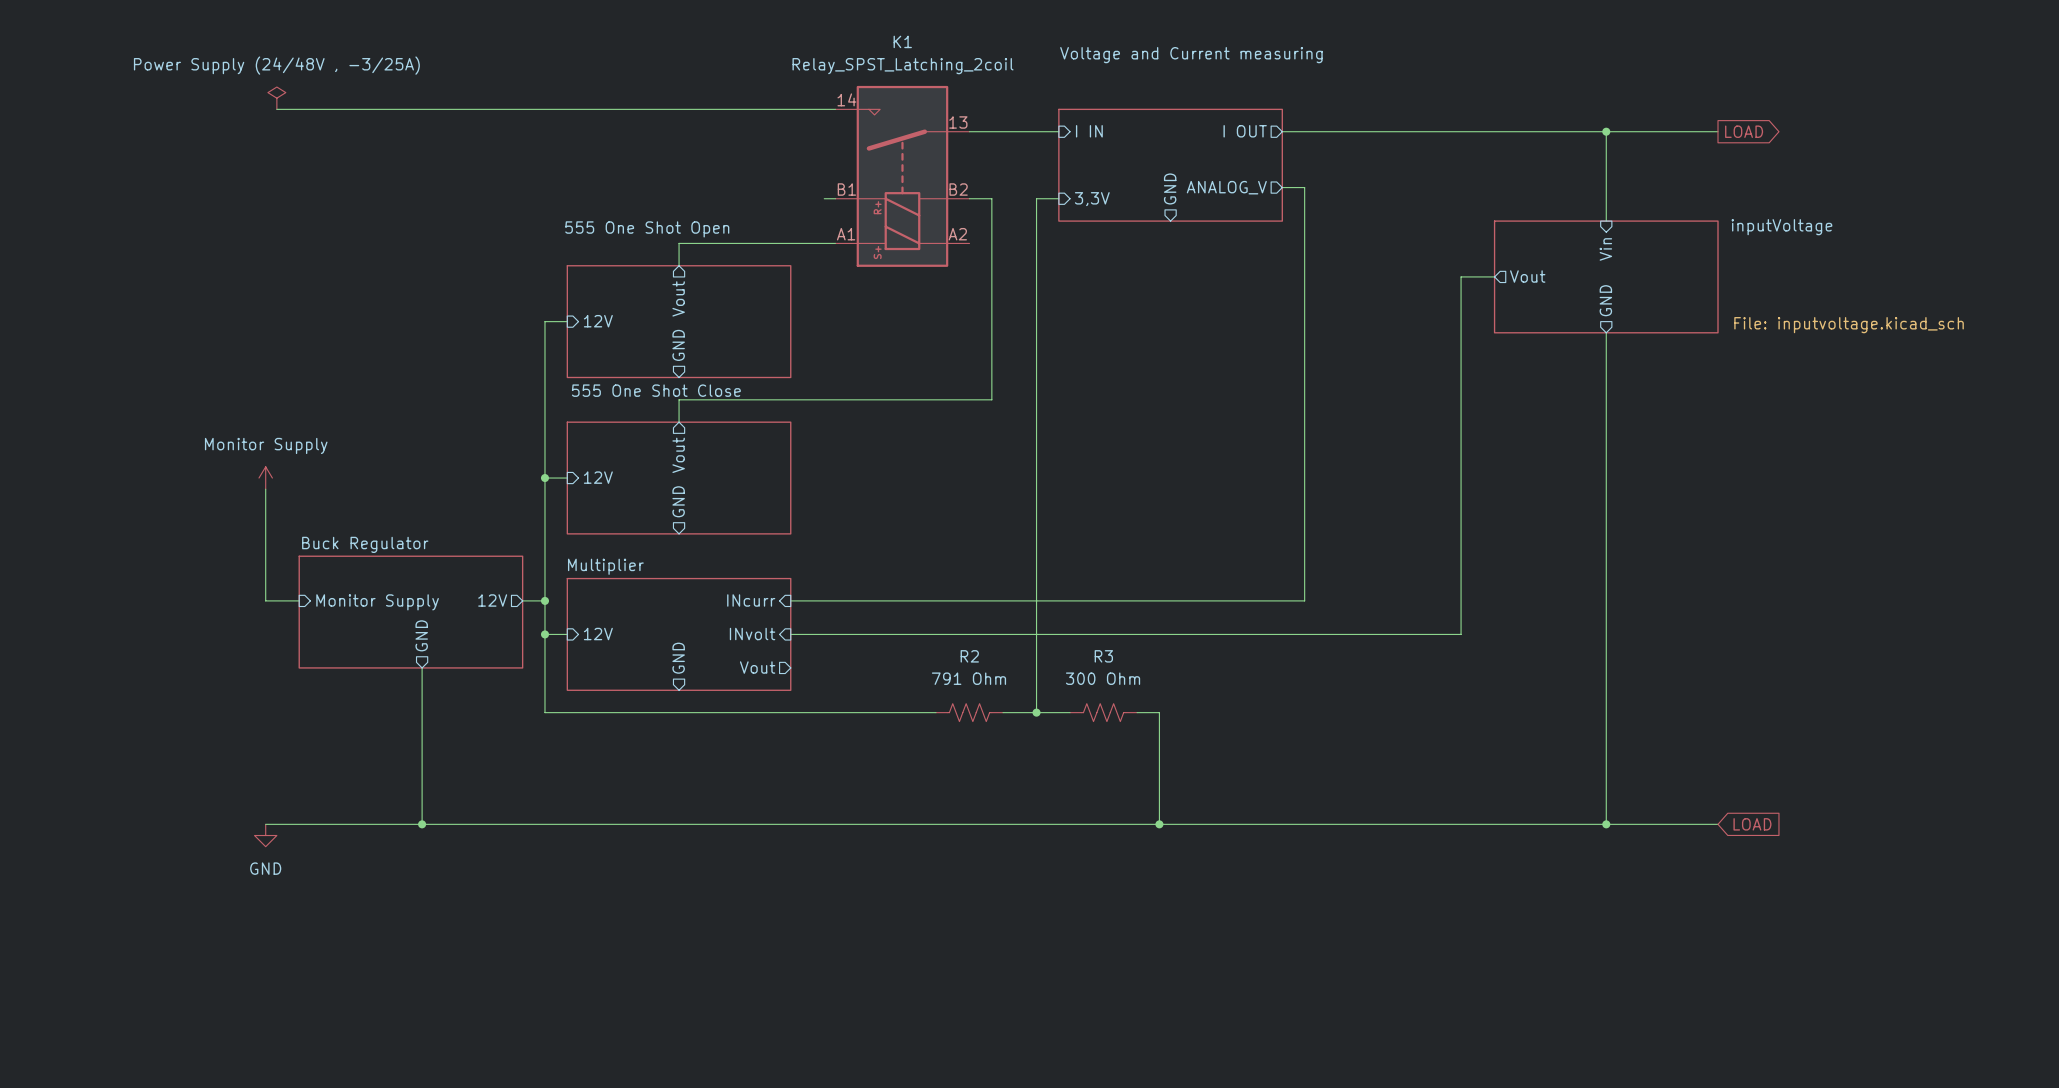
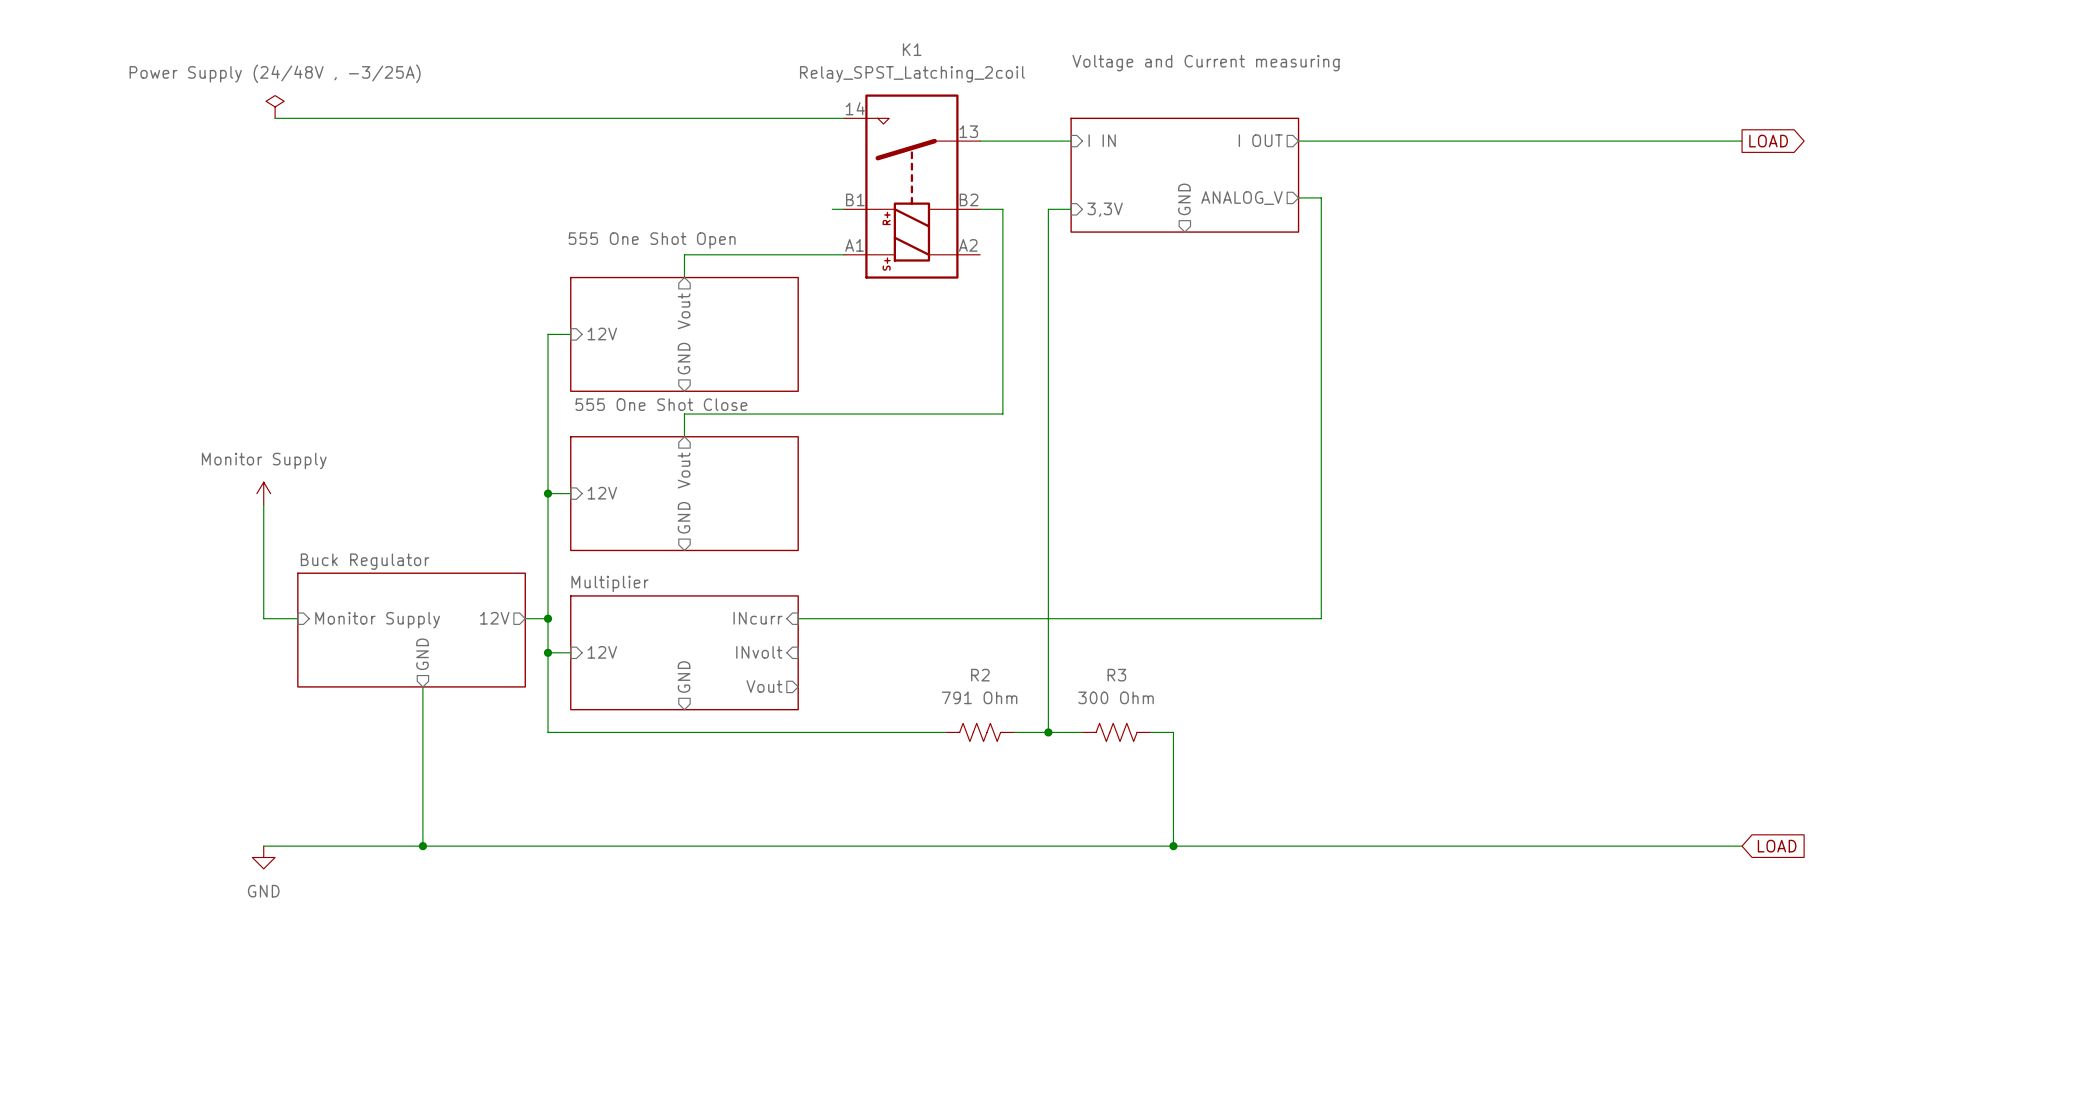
wire: (1606, 131) (1606, 221) -> none
junction: (1606, 131) -> none
sheet pin: Vin (1605, 249) -> none
wire: (1494, 276) (1461, 276) (1461, 634) (790, 634) -> none
sheet pin: Vout (1527, 276) -> none
sheet inputVoltage: File: inputvoltage.kicad_sch (1606, 276) -> none
sheet pin: GND (1605, 300) -> none
wire: (1606, 332) (1606, 824) -> none
junction: (1606, 824) -> none

